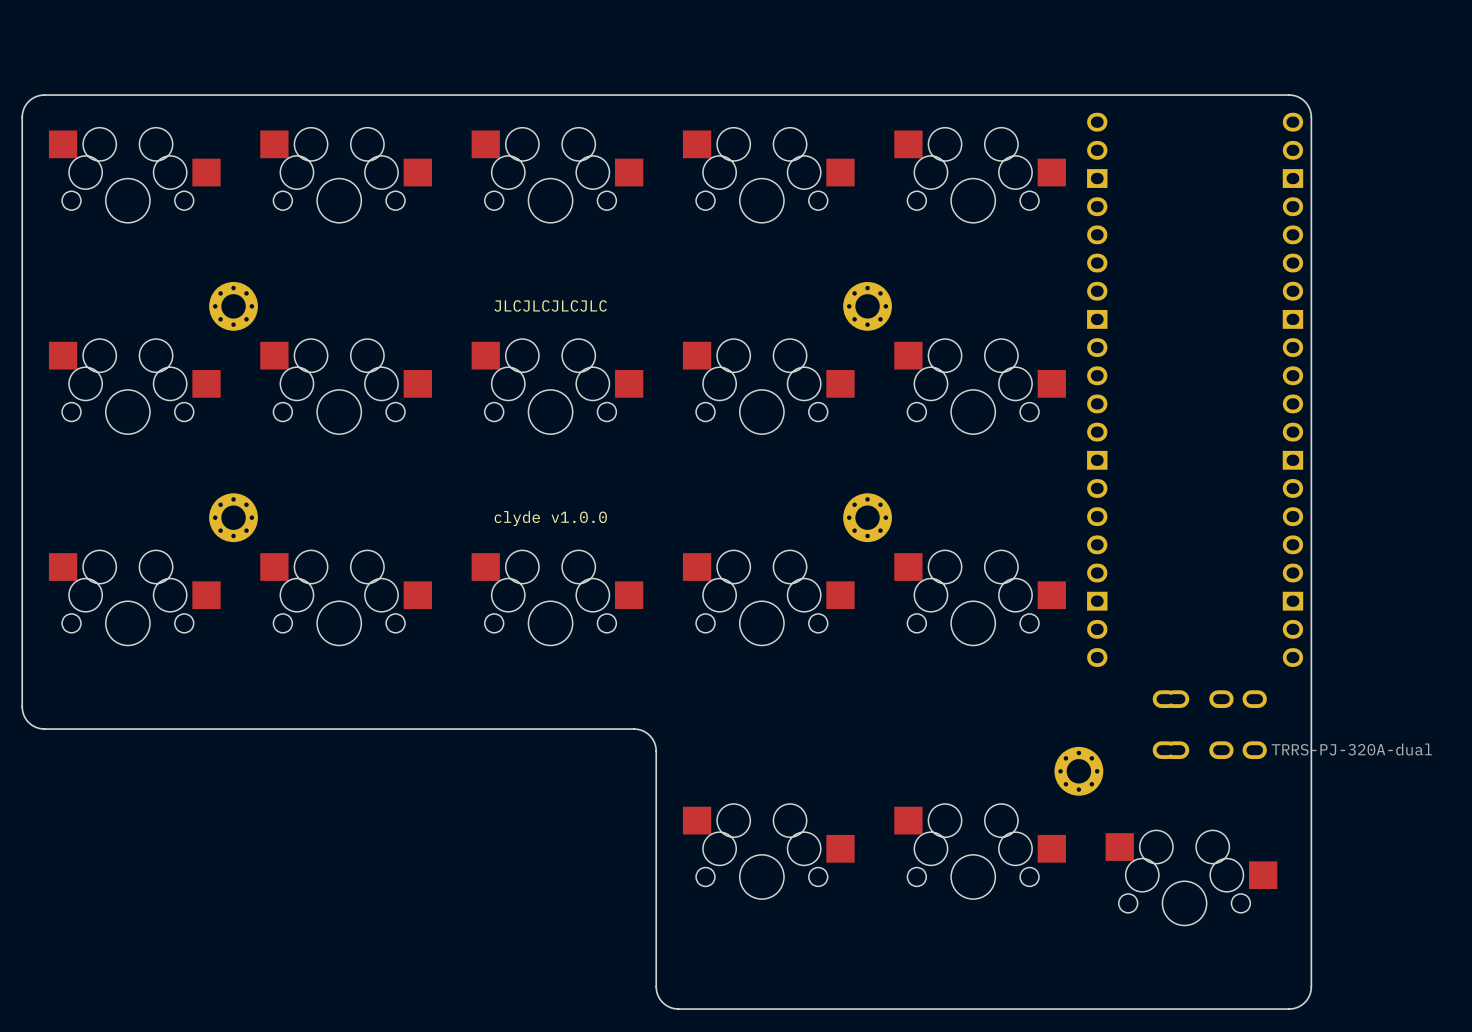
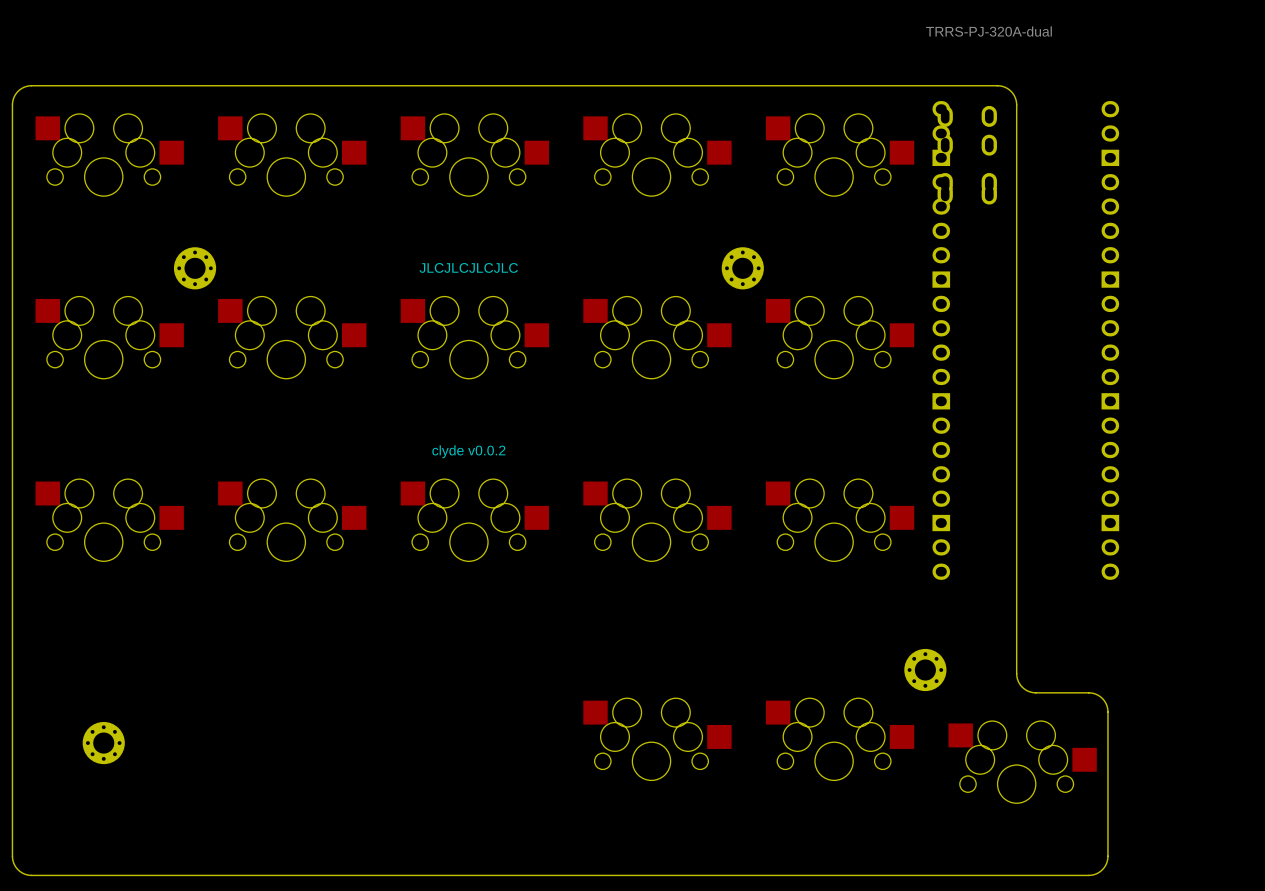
board edge: (1162, 95) (1292, 95) (1304, 101) (1311, 114) (1311, 986) (1308, 997) (1300, 1006) (1292, 1008) (1268, 1009) -> (997, 85) (1011, 91) (1016, 104) (1016, 676) (1022, 687) (1030, 692) (1091, 693) (1100, 696) (1106, 704) (1107, 858) (1102, 869) (1088, 875)
part: none -> TRRS-PJ-320A-dual (967, 155)
part: (233, 517) -> none
part: (867, 517) -> none
text: clyde v1.0.0 (550, 518) -> clyde v0.0.2 (468, 451)
board edge: (22, 706) (23, 715) (28, 722) (35, 727) (44, 729) (634, 729) (642, 730) (651, 737) (656, 751) (656, 989) (662, 1002) (669, 1007) (678, 1009) -> (12, 614) (12, 856) (16, 867) (24, 873) (579, 875)
part: TRRS-PJ-320A-dual (1209, 724) -> none
part: none -> (103, 743)

